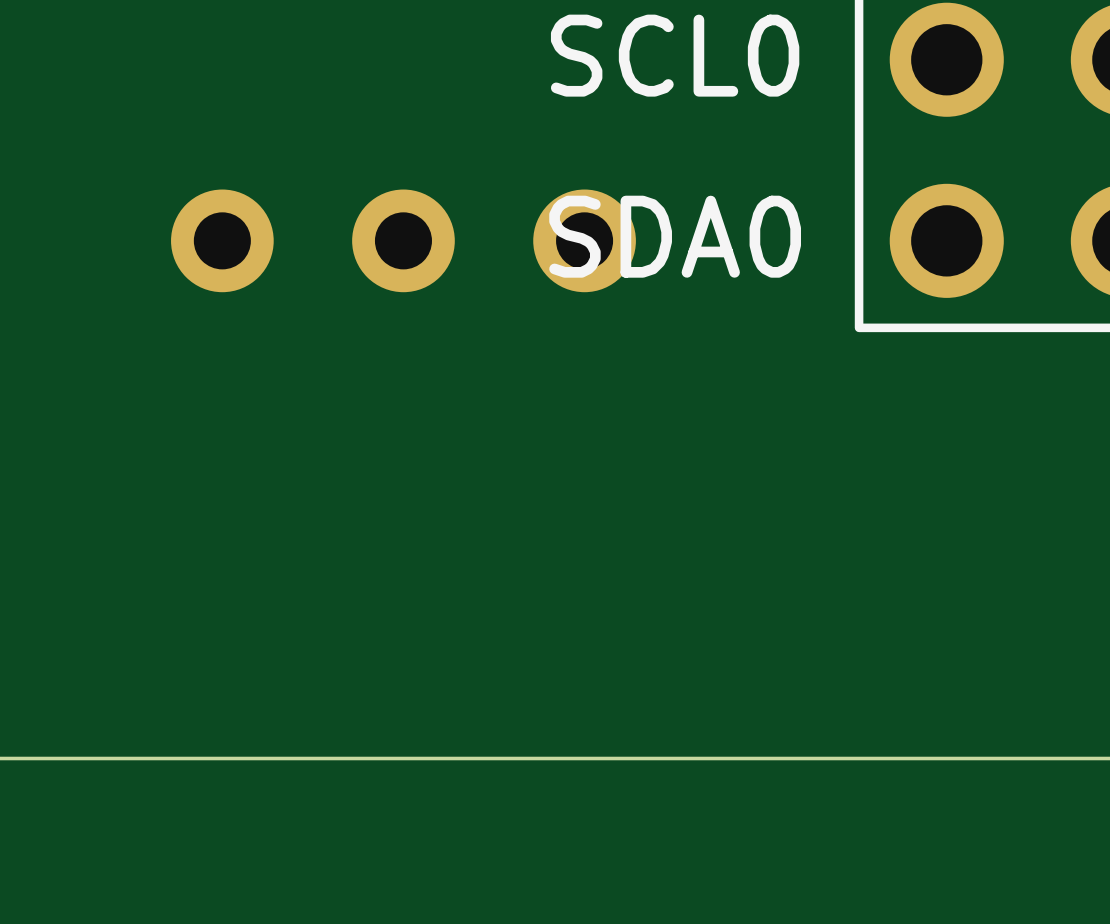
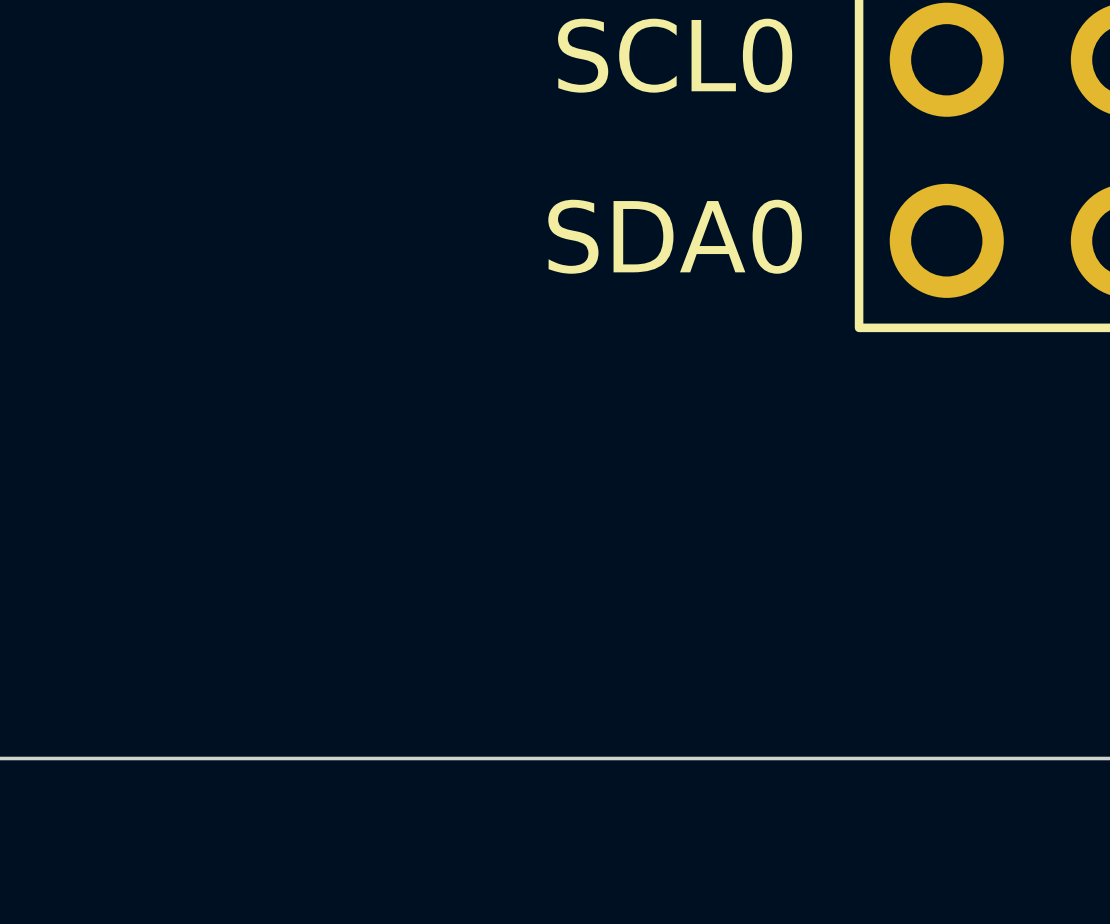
part: (403, 240) -> none

